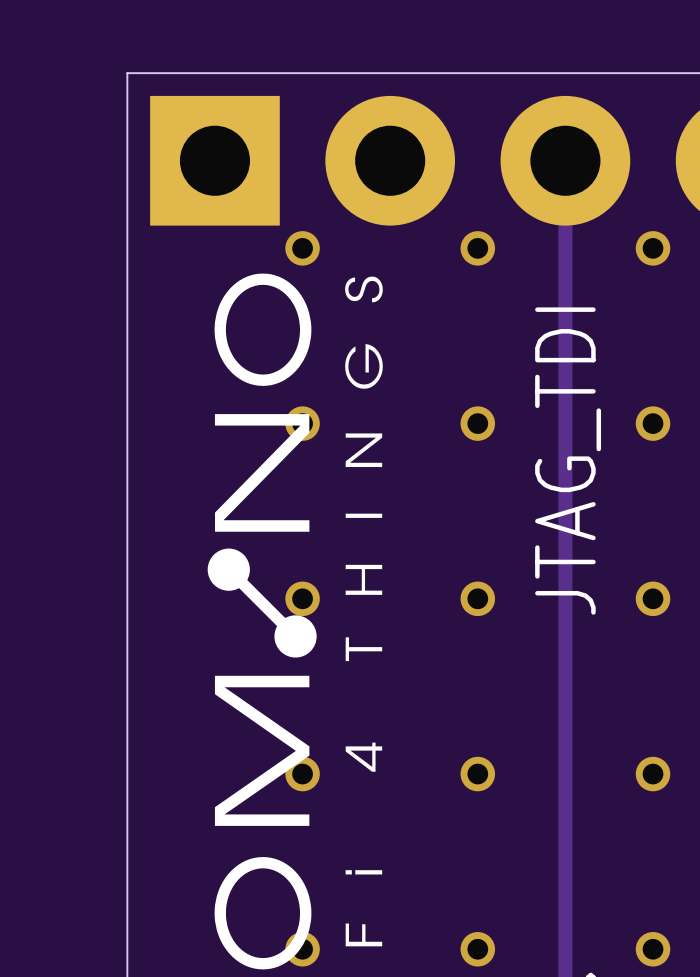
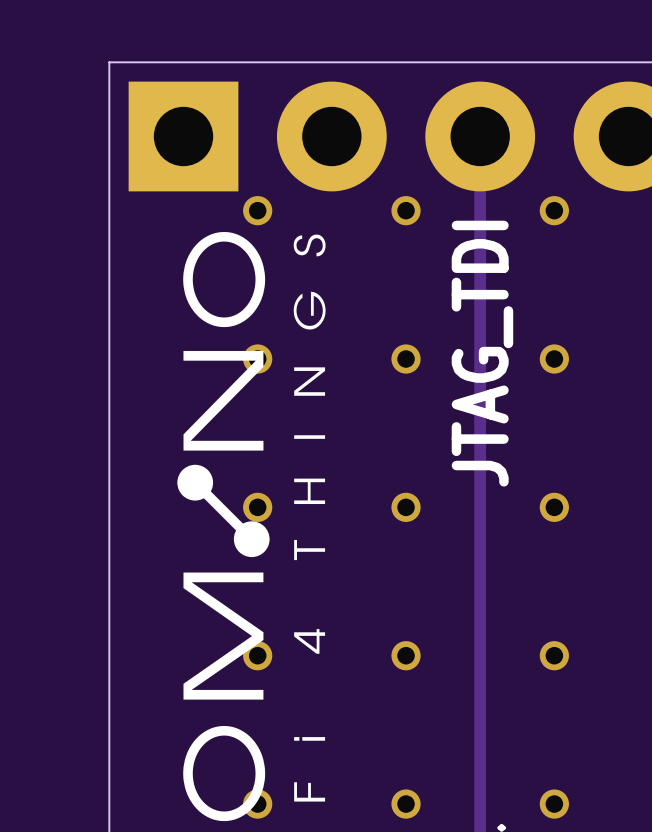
text position: JTAG_TDI (568, 461) -> JTAG_TDI (482, 353)

